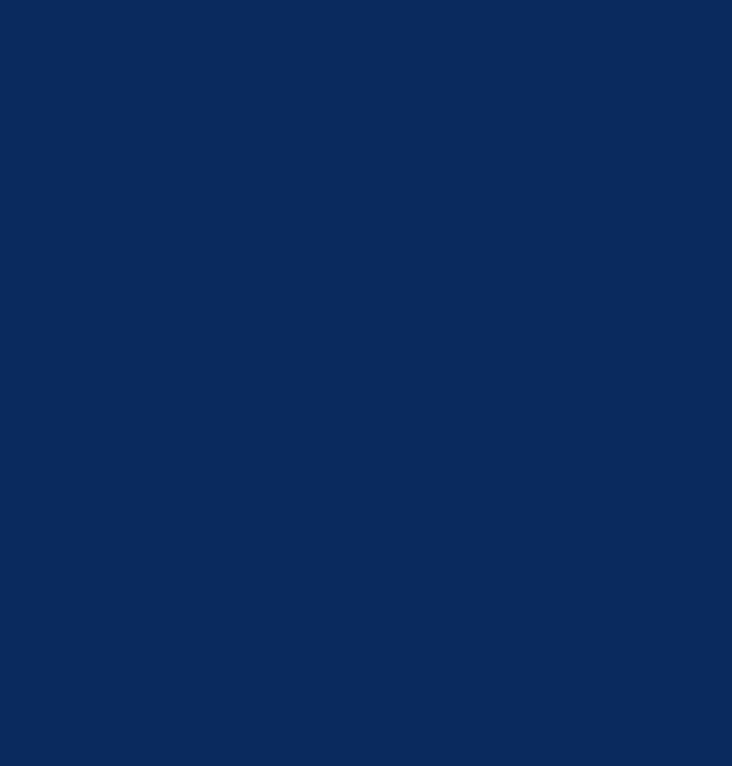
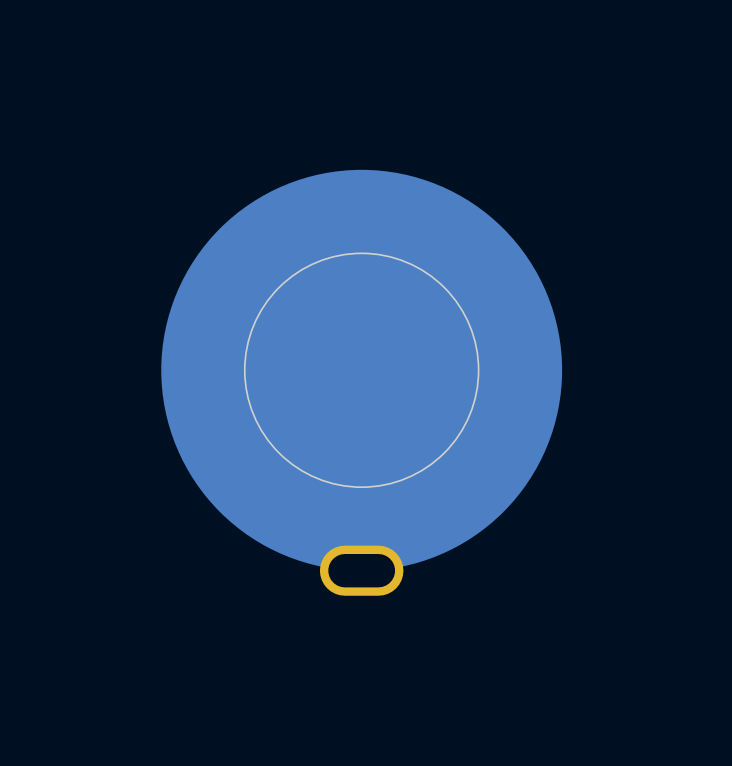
part: none -> (361, 382)

